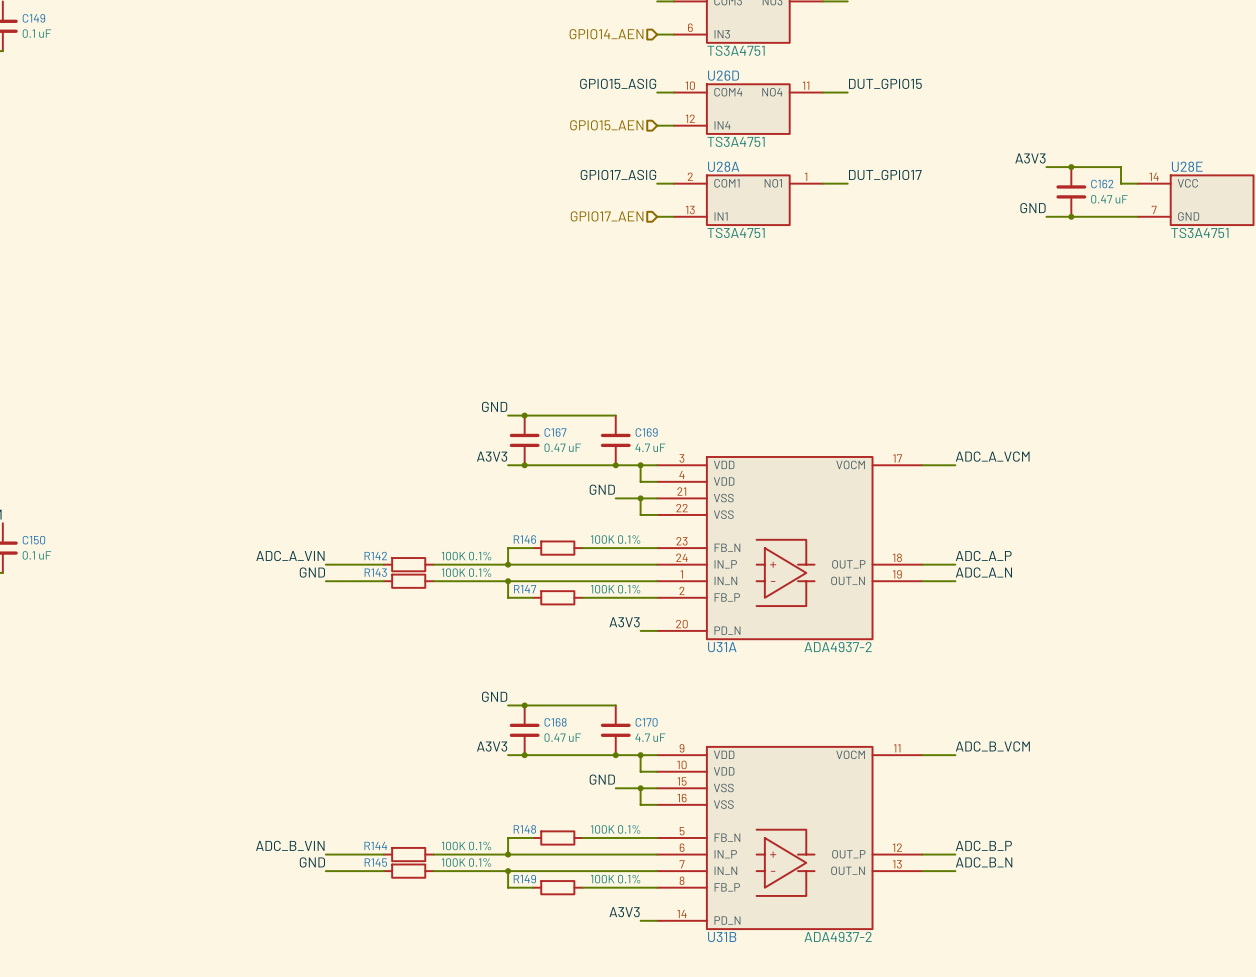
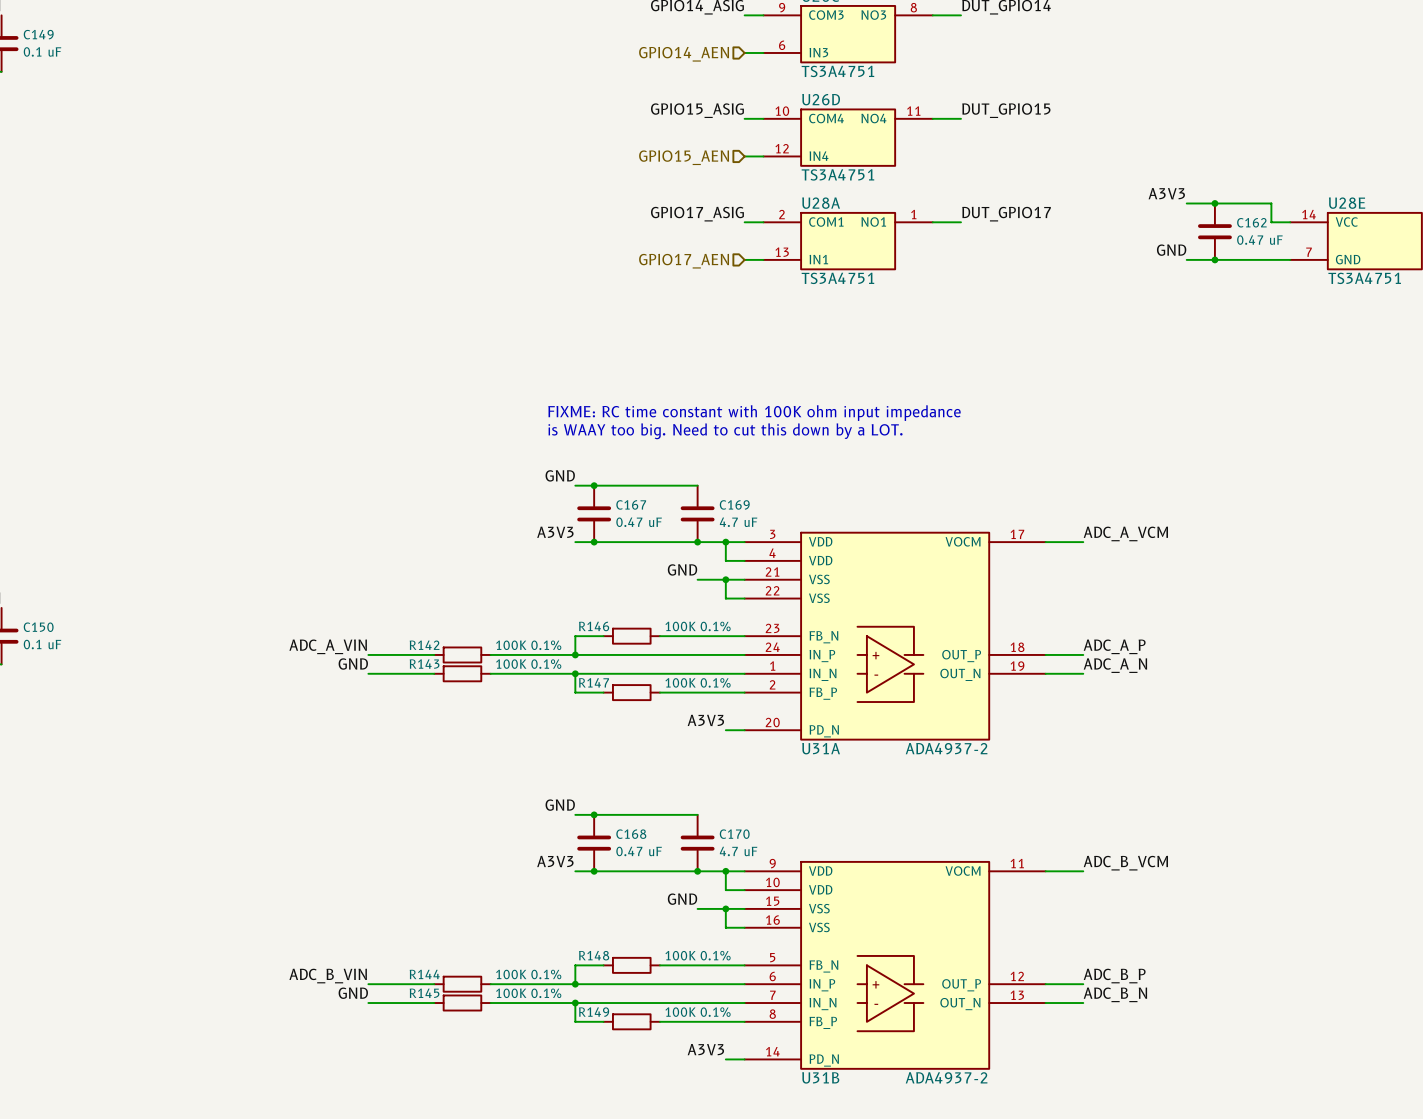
text: none -> FIXME: RC time constant with 100K ohm input impedance (754, 413)
text: none -> is WAAY too big. Need to cut this down by a LOT. (725, 431)

